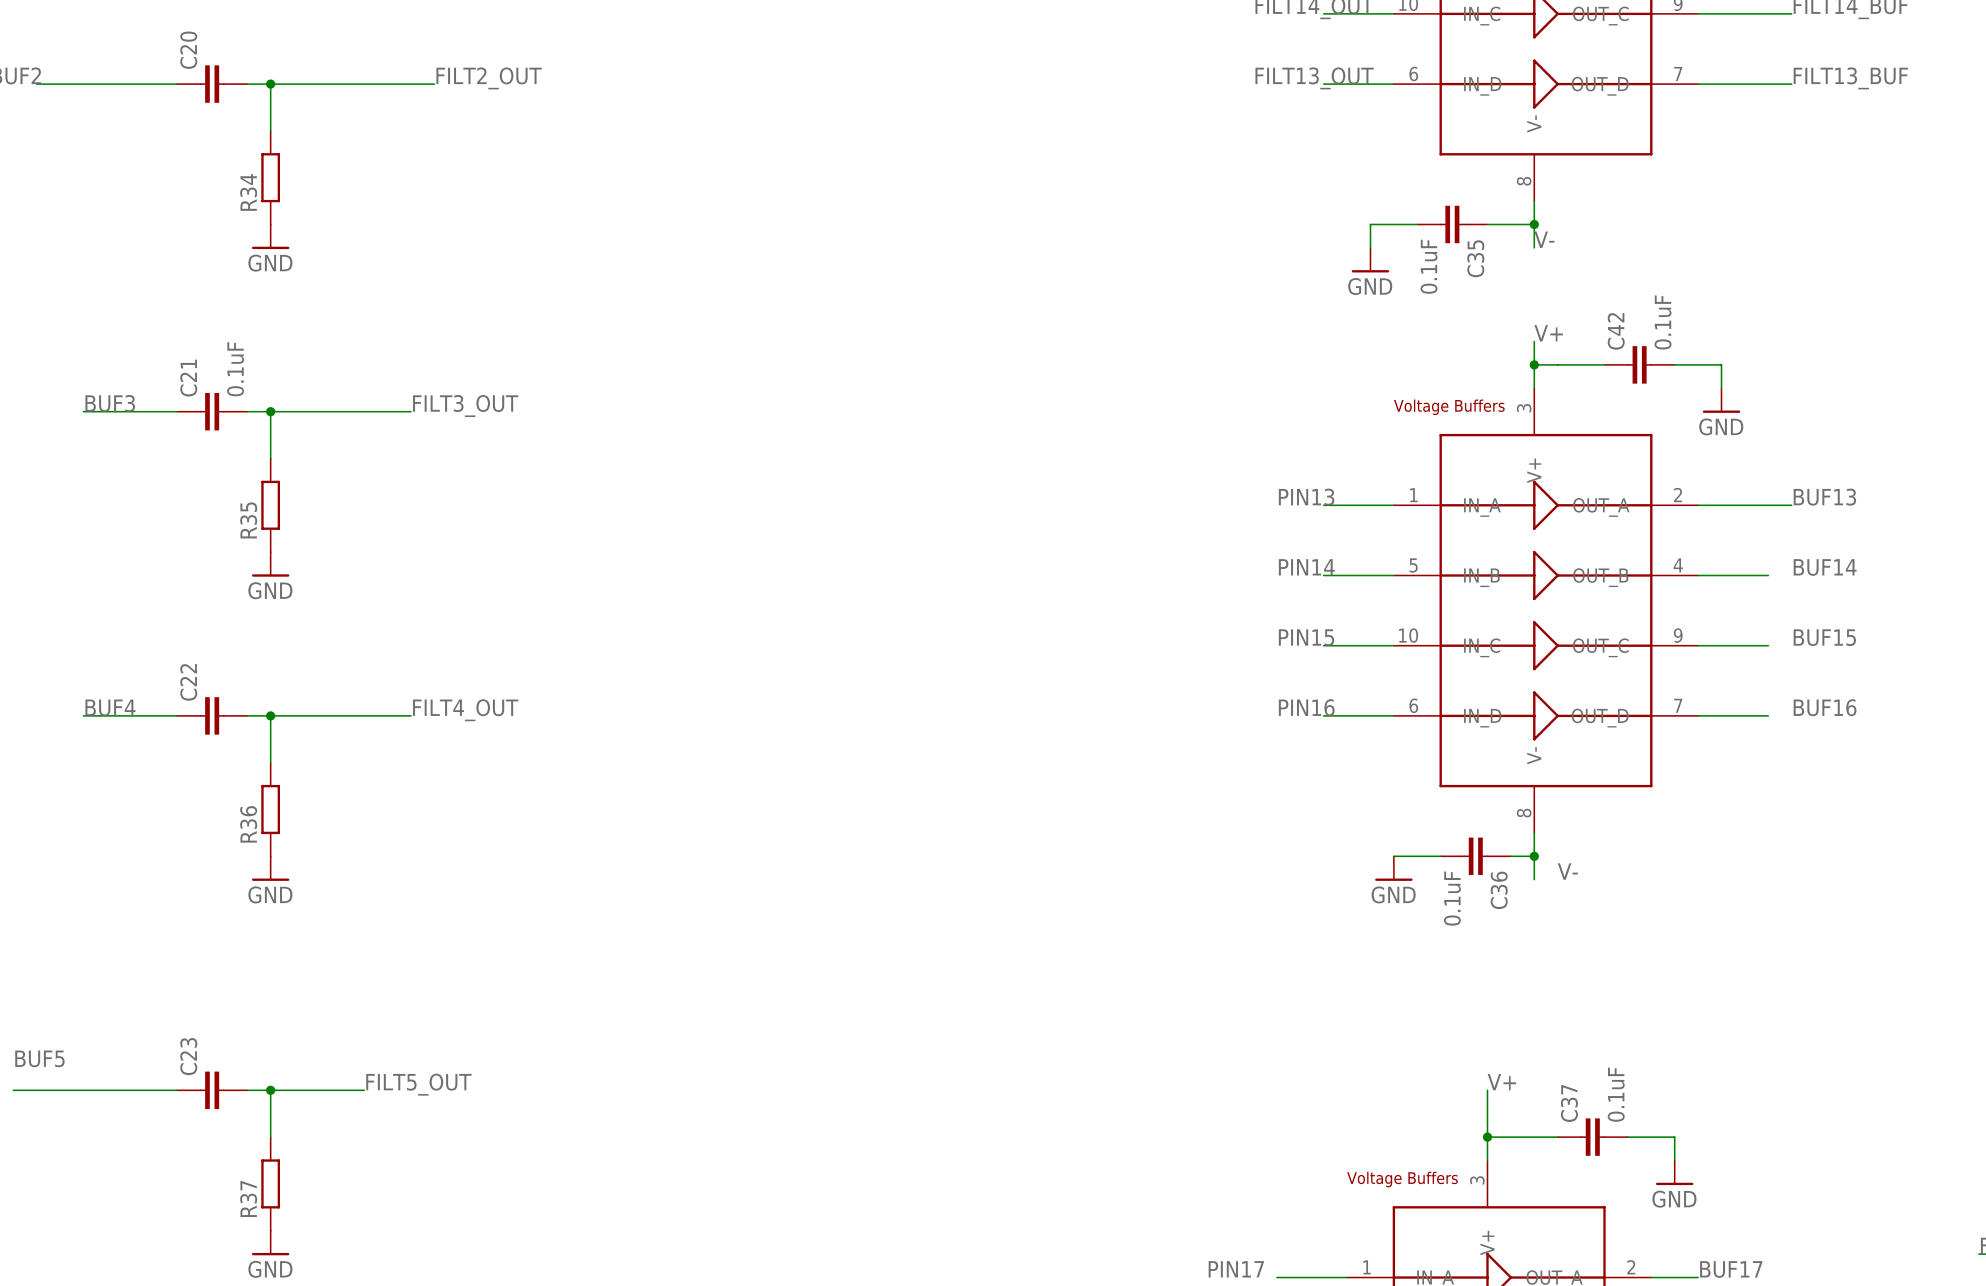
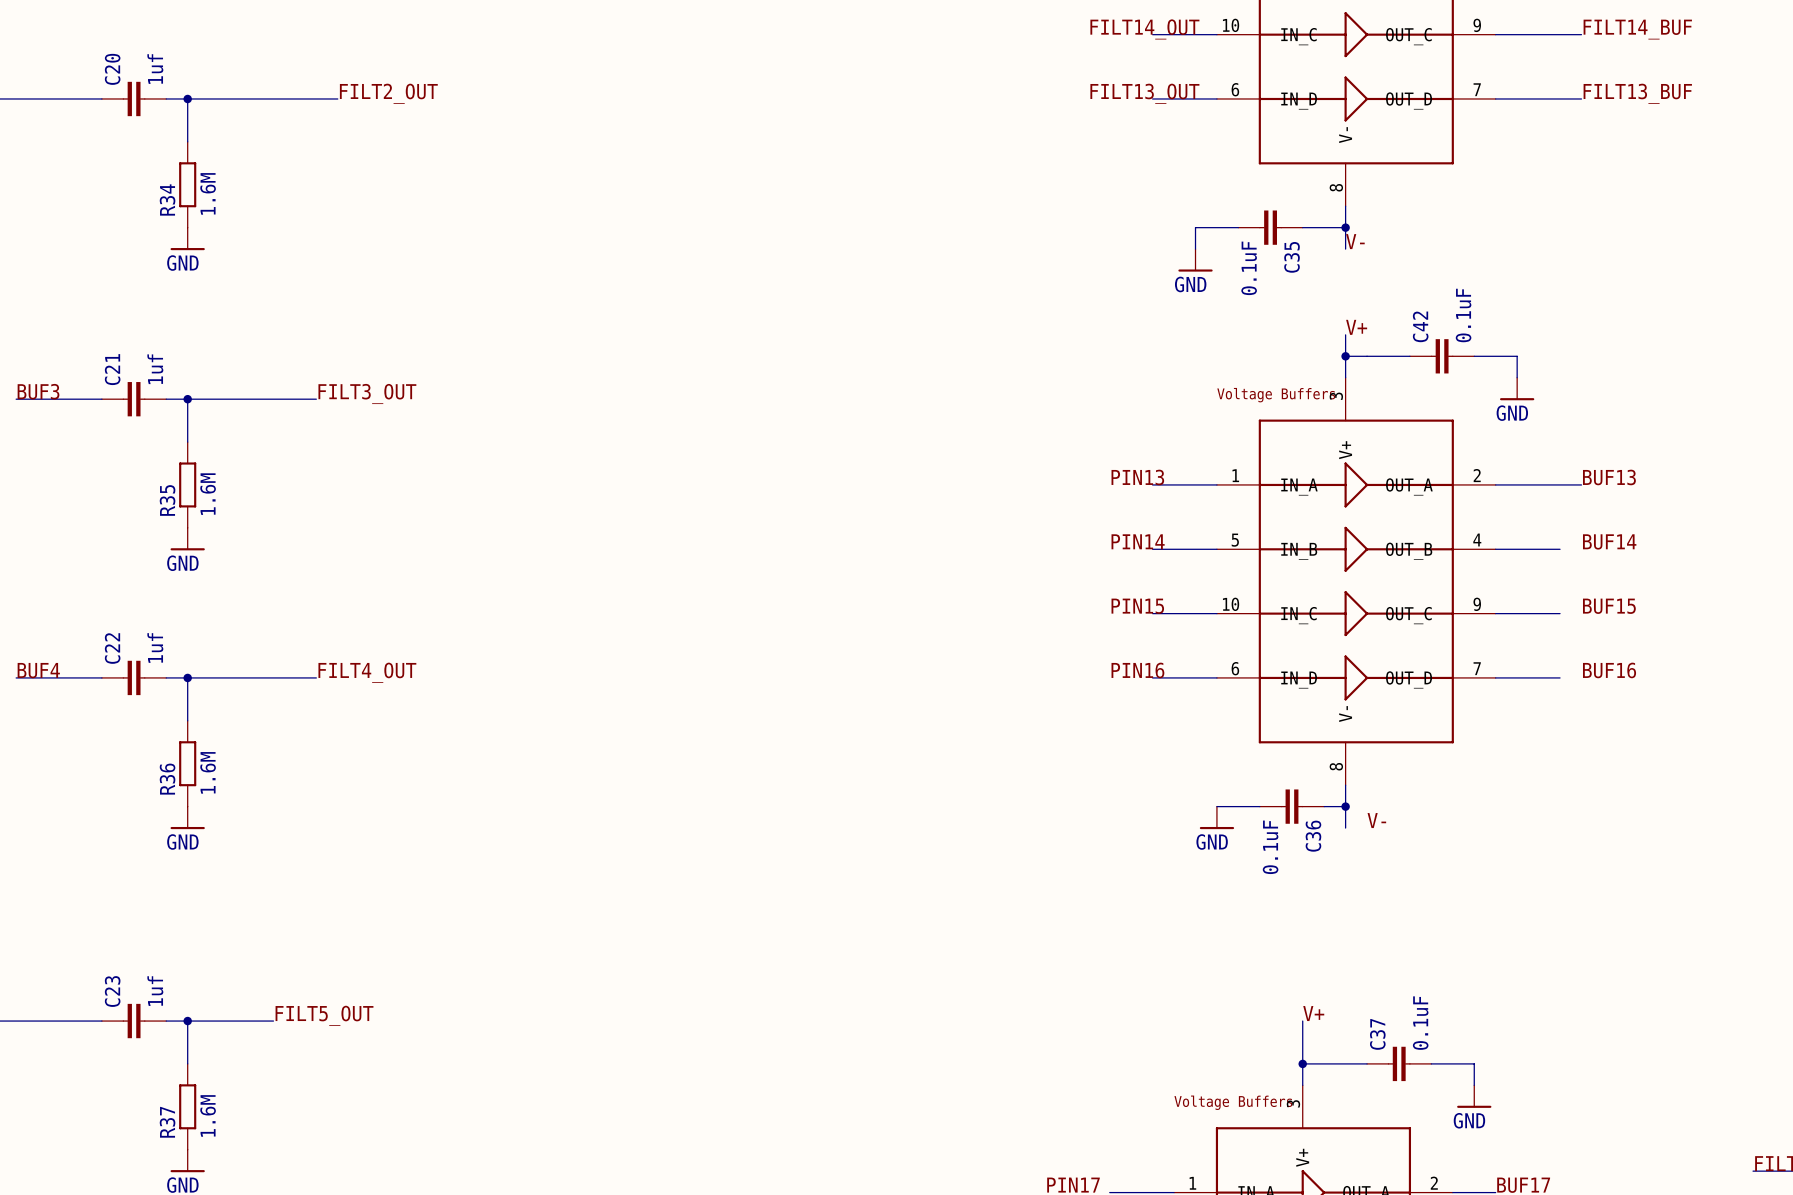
C20 value: none -> 1uf (155, 69)
R34 value: none -> 1.6M (208, 193)
C21 value: 0.1uF (235, 369) -> 1uf (155, 369)
R35 value: none -> 1.6M (208, 494)
C22 value: none -> 1uf (155, 648)
R36 value: none -> 1.6M (208, 772)
C23 value: none -> 1uf (155, 991)
R37 value: none -> 1.6M (208, 1115)

